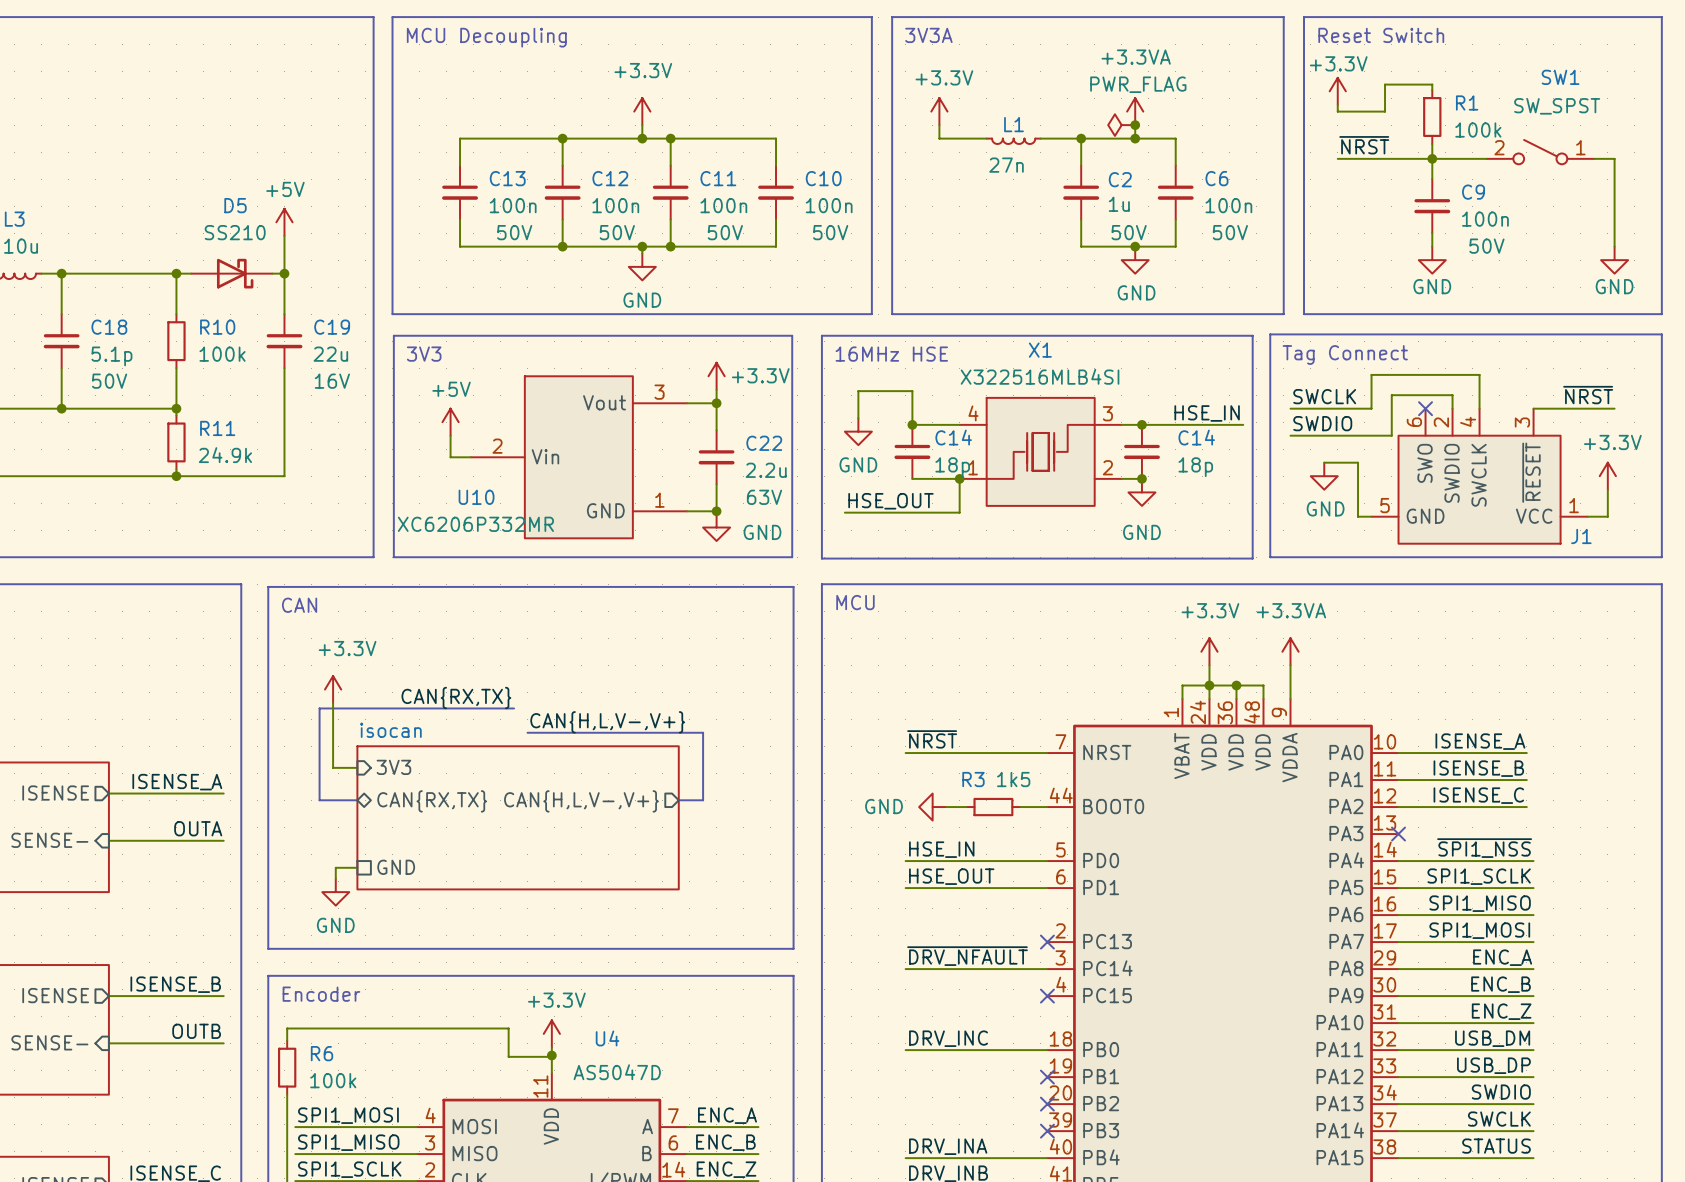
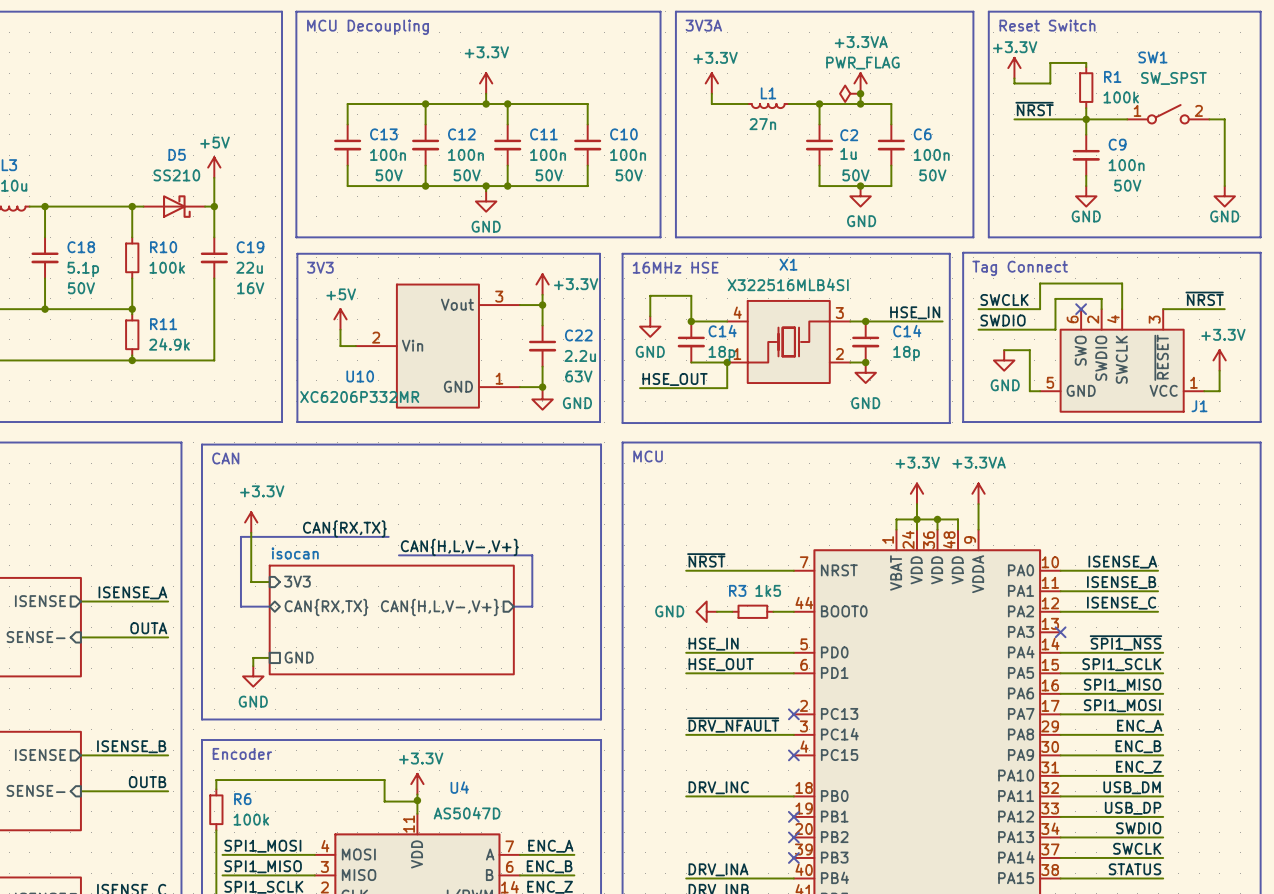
SW1 flip: as is (1540, 152) -> left-right (1168, 114)

